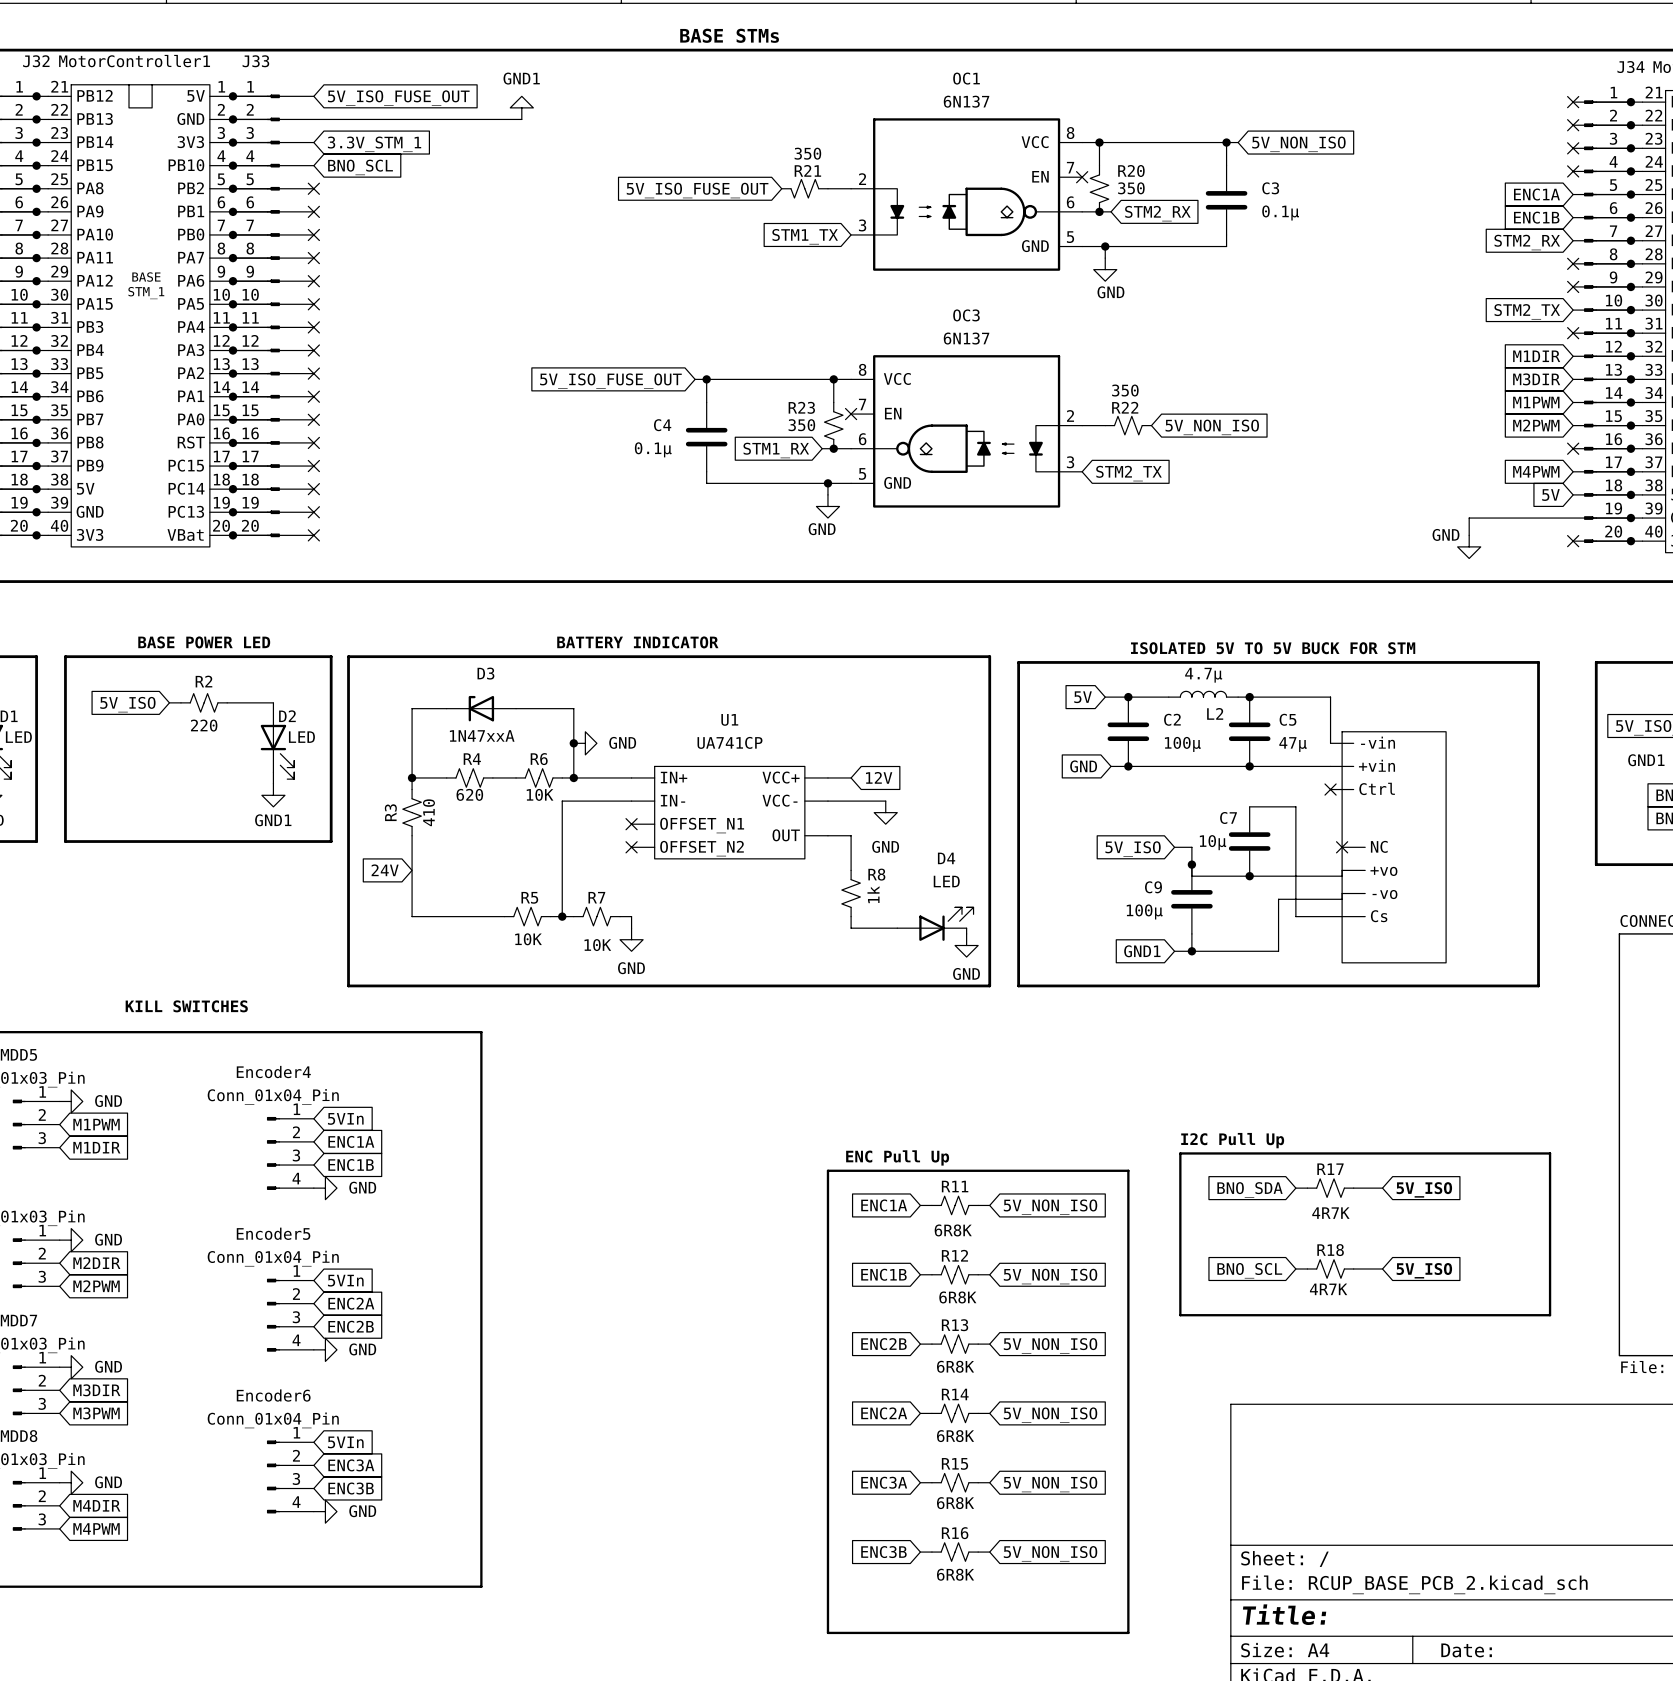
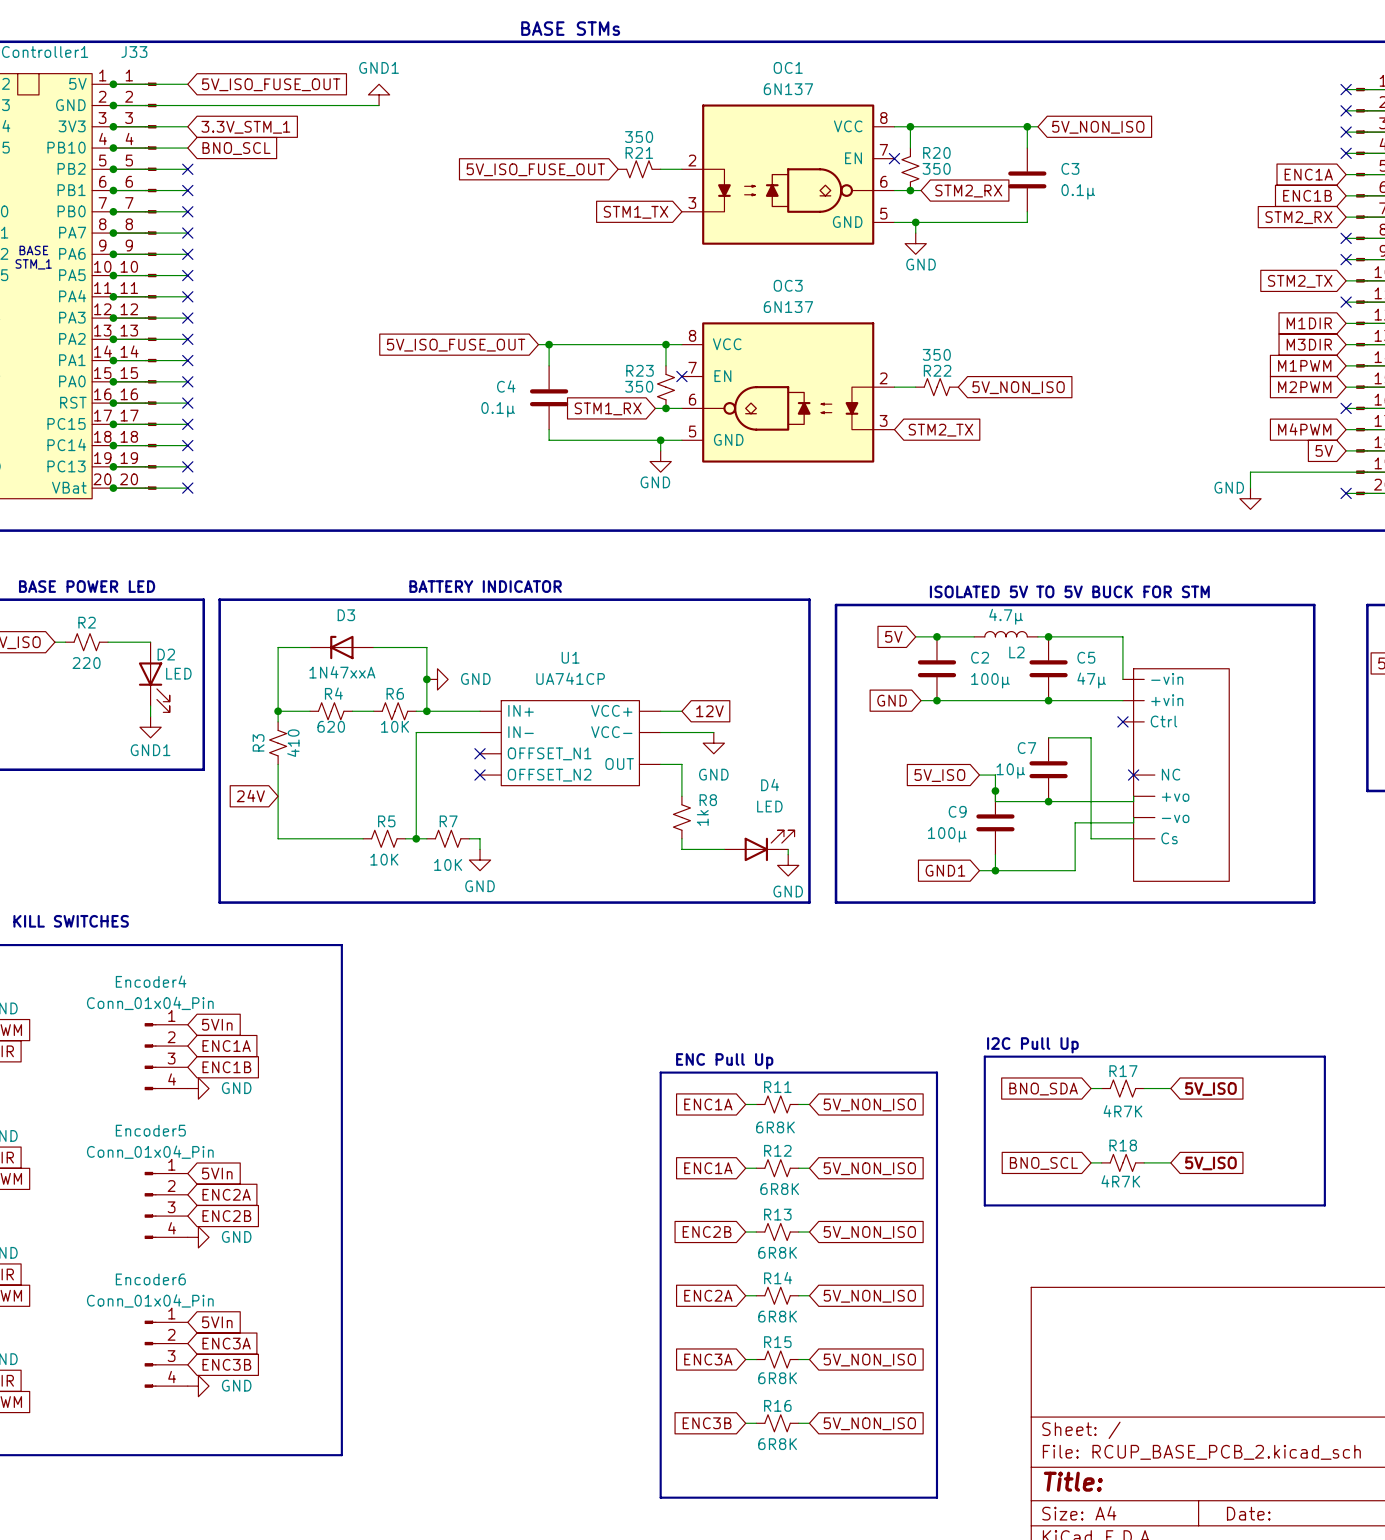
global label: ENC1B (883, 1274) -> ENC1A (708, 1168)

